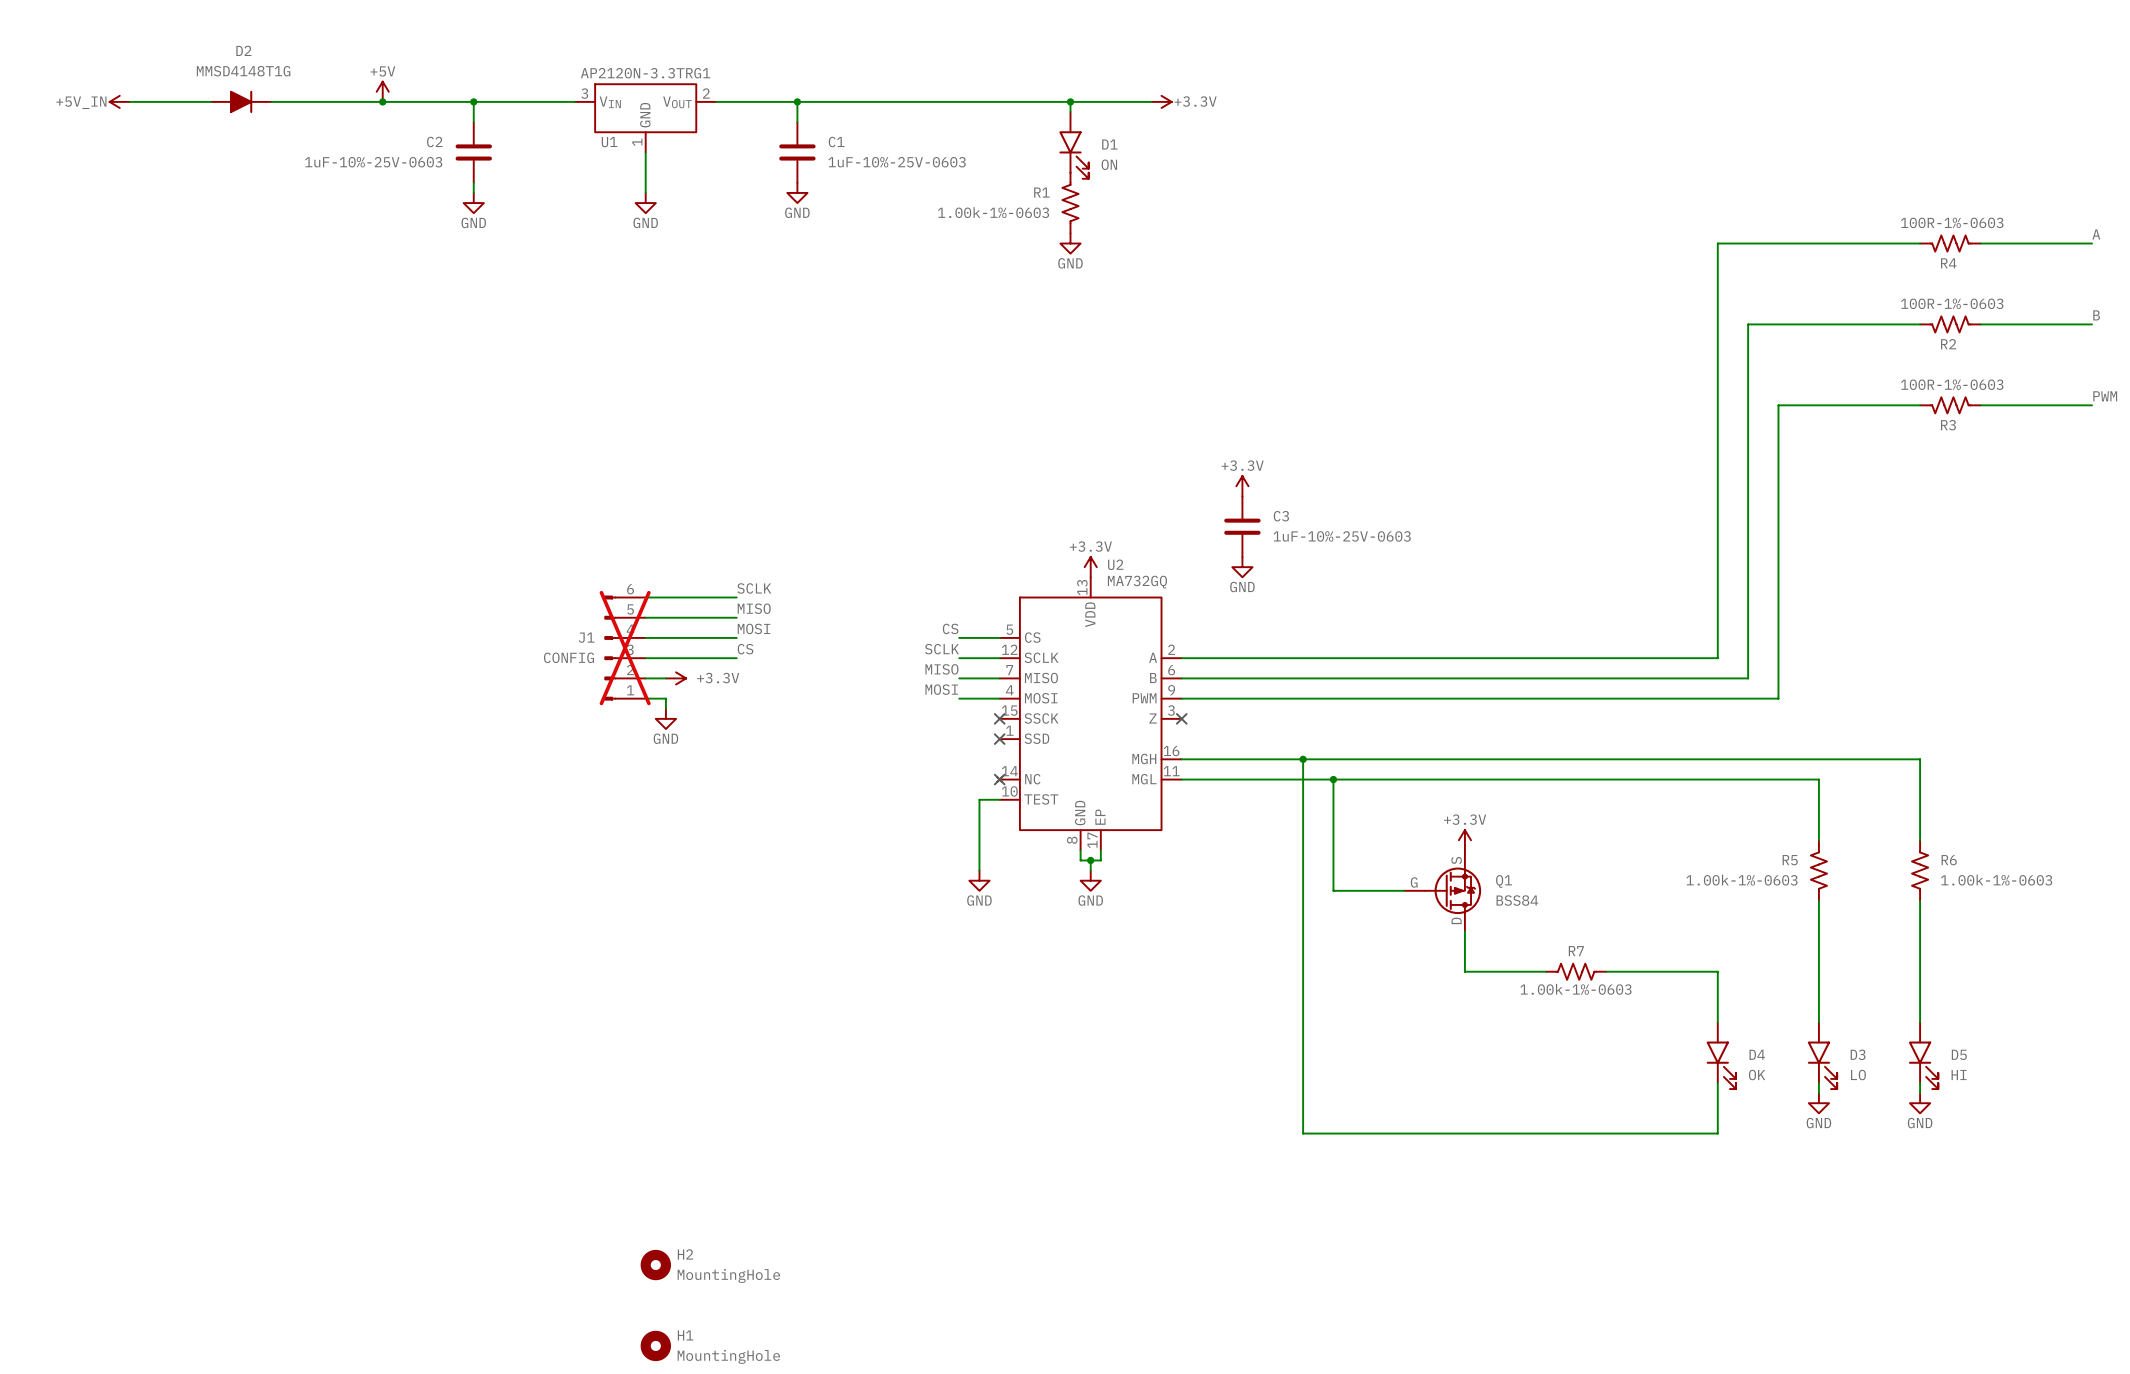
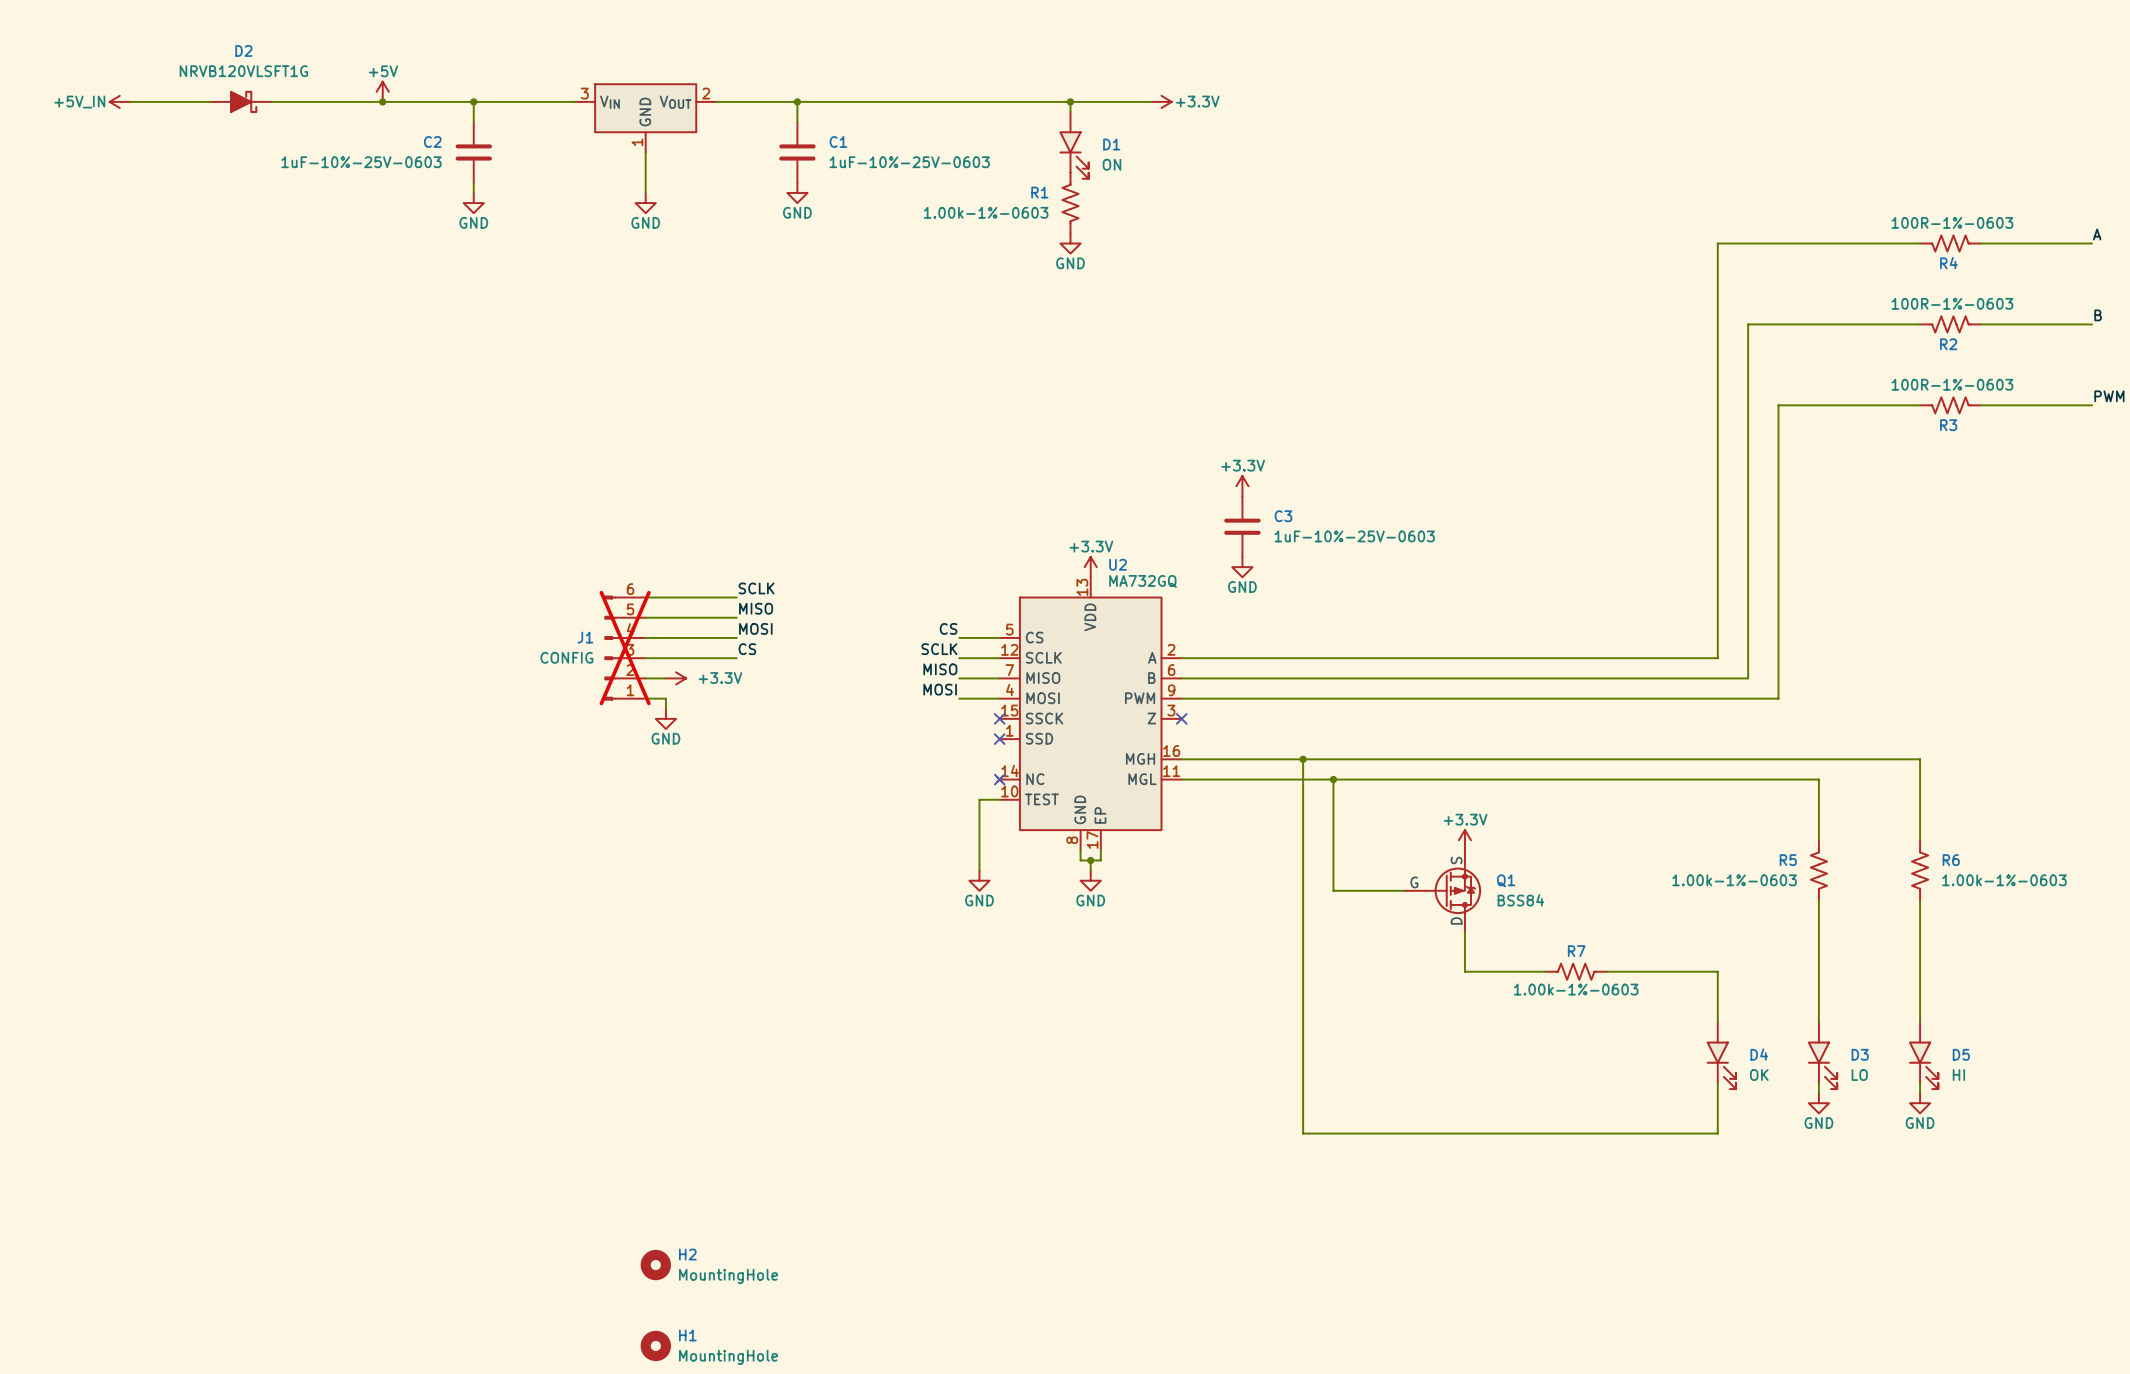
D2 value: MMSD4148T1G (243, 71) -> NRVB120VLSFT1G (243, 71)
U1 value: AP2120N-3.3TRG1 (645, 73) -> none
D2 symbol: [210, 90, 272, 114] -> [210, 90, 272, 114]
U1 name: U1 (609, 142) -> none

